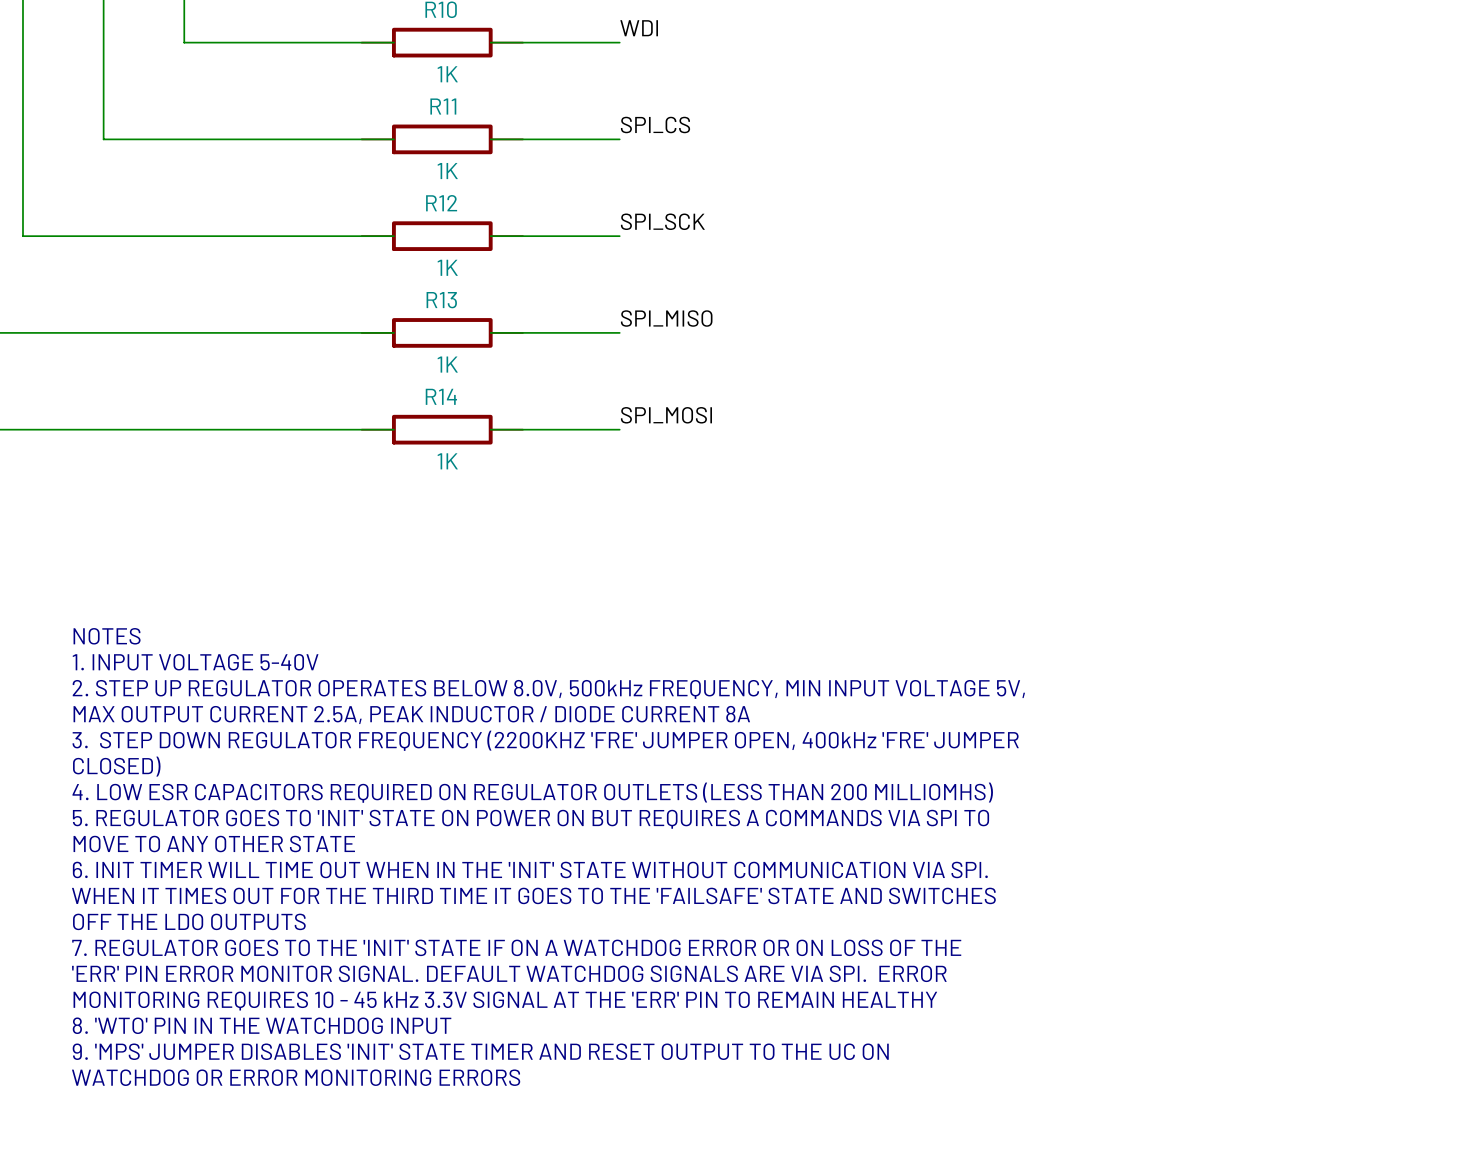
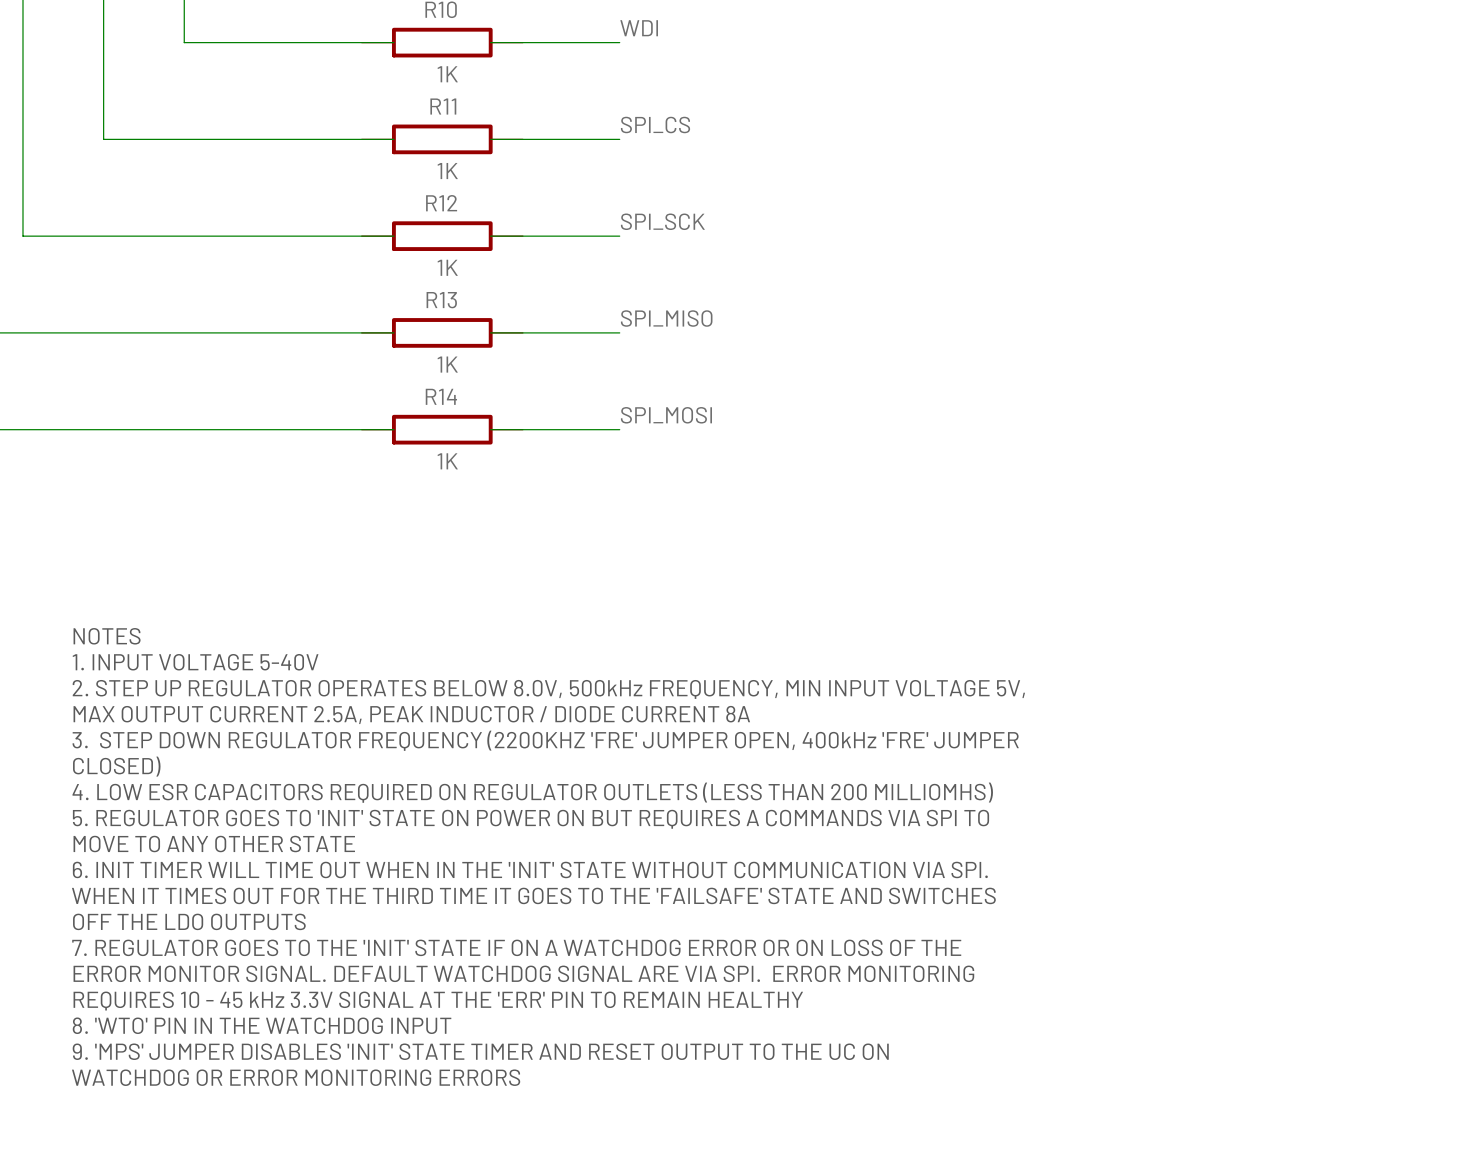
text: 'ERR' PIN ERROR MONITOR SIGNAL. DEFAULT WATCHDOG SIGNALS ARE VIA SPI. ERROR (509, 973) -> ERROR MONITOR SIGNAL. DEFAULT WATCHDOG SIGNAL ARE VIA SPI. ERROR MONITORING (523, 973)
text: MONITORING REQUIRES 10 - 45 kHz 3.3V SIGNAL AT THE 'ERR' PIN TO REMAIN HEALTHY (505, 1001) -> REQUIRES 10 - 45 kHz 3.3V SIGNAL AT THE 'ERR' PIN TO REMAIN HEALTHY (438, 1001)

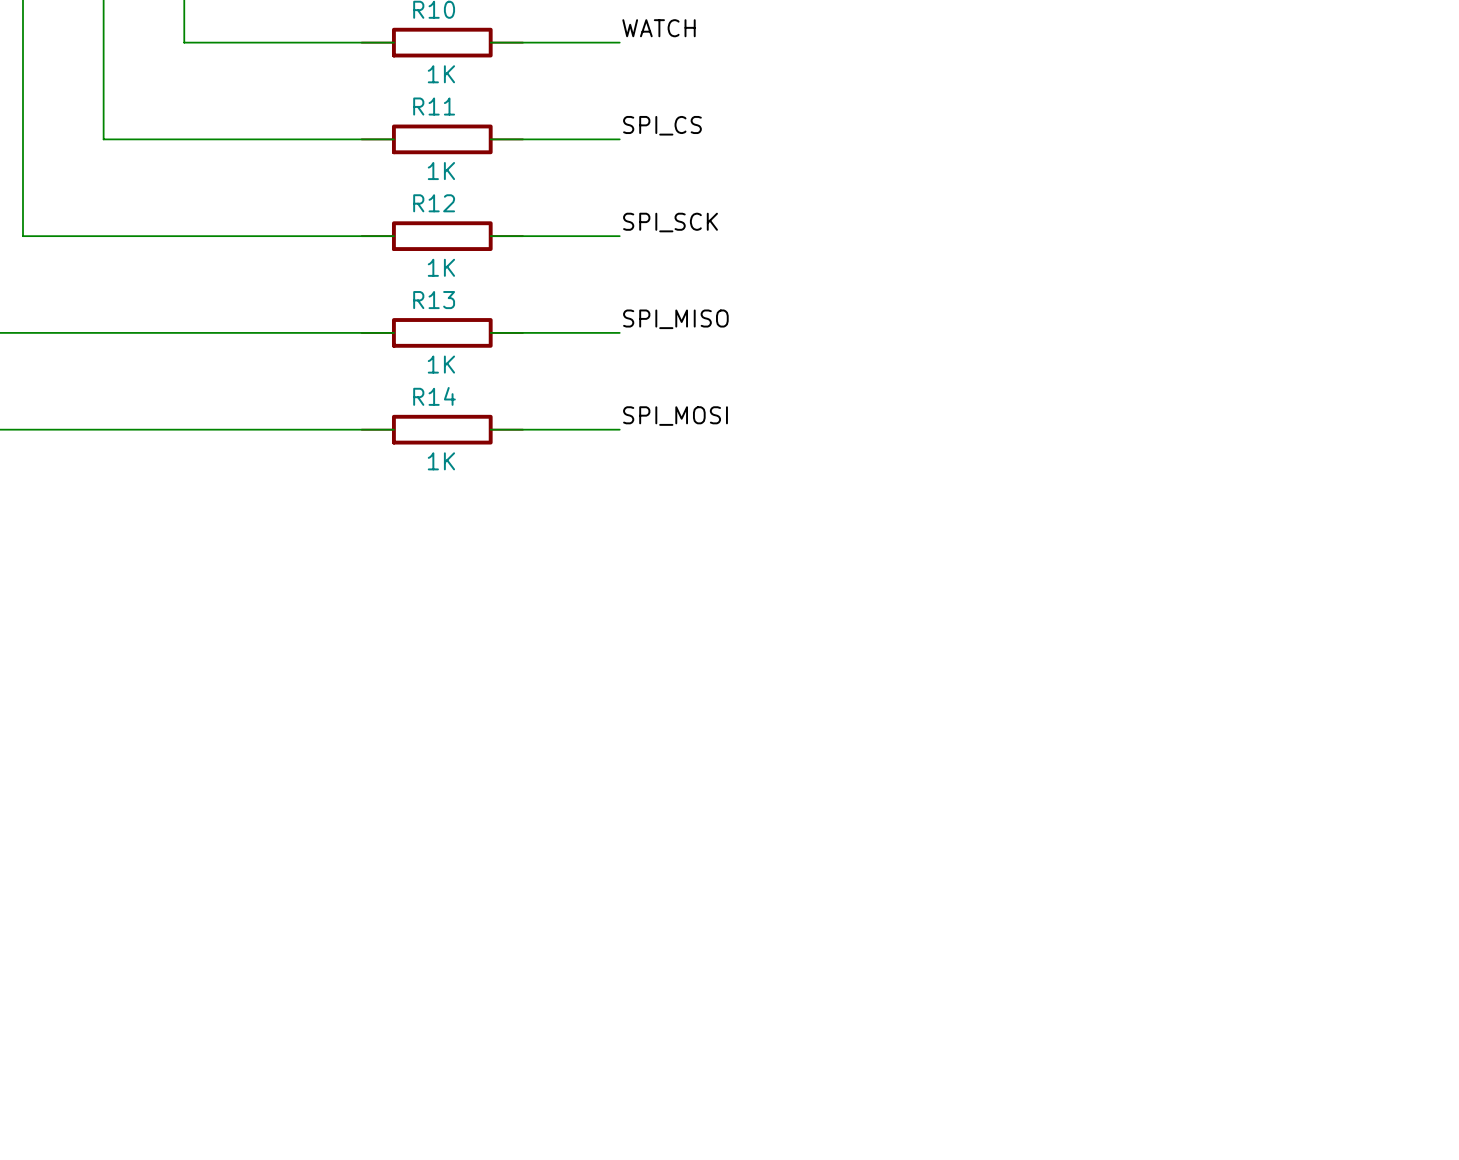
label: WDI (639, 28) -> WATCH (659, 28)
text: NOTES (107, 636) -> none
text: 1. INPUT VOLTAGE 5-40V (195, 662) -> none
text: 2. STEP UP REGULATOR OPERATES BELOW 8.0V, 500kHz FREQUENCY, MIN INPUT VOLTAGE 5V, (548, 689) -> none
text: MAX OUTPUT CURRENT 2.5A, PEAK INDUCTOR / DIODE CURRENT 8A (411, 714) -> none
text: 3. STEP DOWN REGULATOR FREQUENCY (2200KHZ 'FRE' JUMPER OPEN, 400kHz 'FRE' JUMPER (545, 740) -> none
text: CLOSED) (116, 766) -> none
text: 4. LOW ESR CAPACITORS REQUIRED ON REGULATOR OUTLETS (LESS THAN 200 MILLIOMHS) (532, 792) -> none
text: 5. REGULATOR GOES TO 'INIT' STATE ON POWER ON BUT REQUIRES A COMMANDS VIA SPI TO (531, 819) -> none
text: MOVE TO ANY OTHER STATE (214, 844) -> none
text: 6. INIT TIMER WILL TIME OUT WHEN IN THE 'INIT' STATE WITHOUT COMMUNICATION VIA SPI. (530, 869) -> none
text: WHEN IT TIMES OUT FOR THE THIRD TIME IT GOES TO THE 'FAILSAFE' STATE AND SWITCHES (533, 895) -> none
text: OFF THE LDO OUTPUTS (189, 921) -> none
text: 7. REGULATOR GOES TO THE 'INIT' STATE IF ON A WATCHDOG ERROR OR ON LOSS OF THE (516, 947) -> none
text: ERROR MONITOR SIGNAL. DEFAULT WATCHDOG SIGNAL ARE VIA SPI. ERROR MONITORING (523, 973) -> none
text: REQUIRES 10 - 45 kHz 3.3V SIGNAL AT THE 'ERR' PIN TO REMAIN HEALTHY (438, 1001) -> none
text: 8. 'WTO' PIN IN THE WATCHDOG INPUT (262, 1025) -> none
text: 9. 'MPS' JUMPER DISABLES 'INIT' STATE TIMER AND RESET OUTPUT TO THE UC ON (480, 1051) -> none
text: WATCHDOG OR ERROR MONITORING ERRORS (296, 1077) -> none

